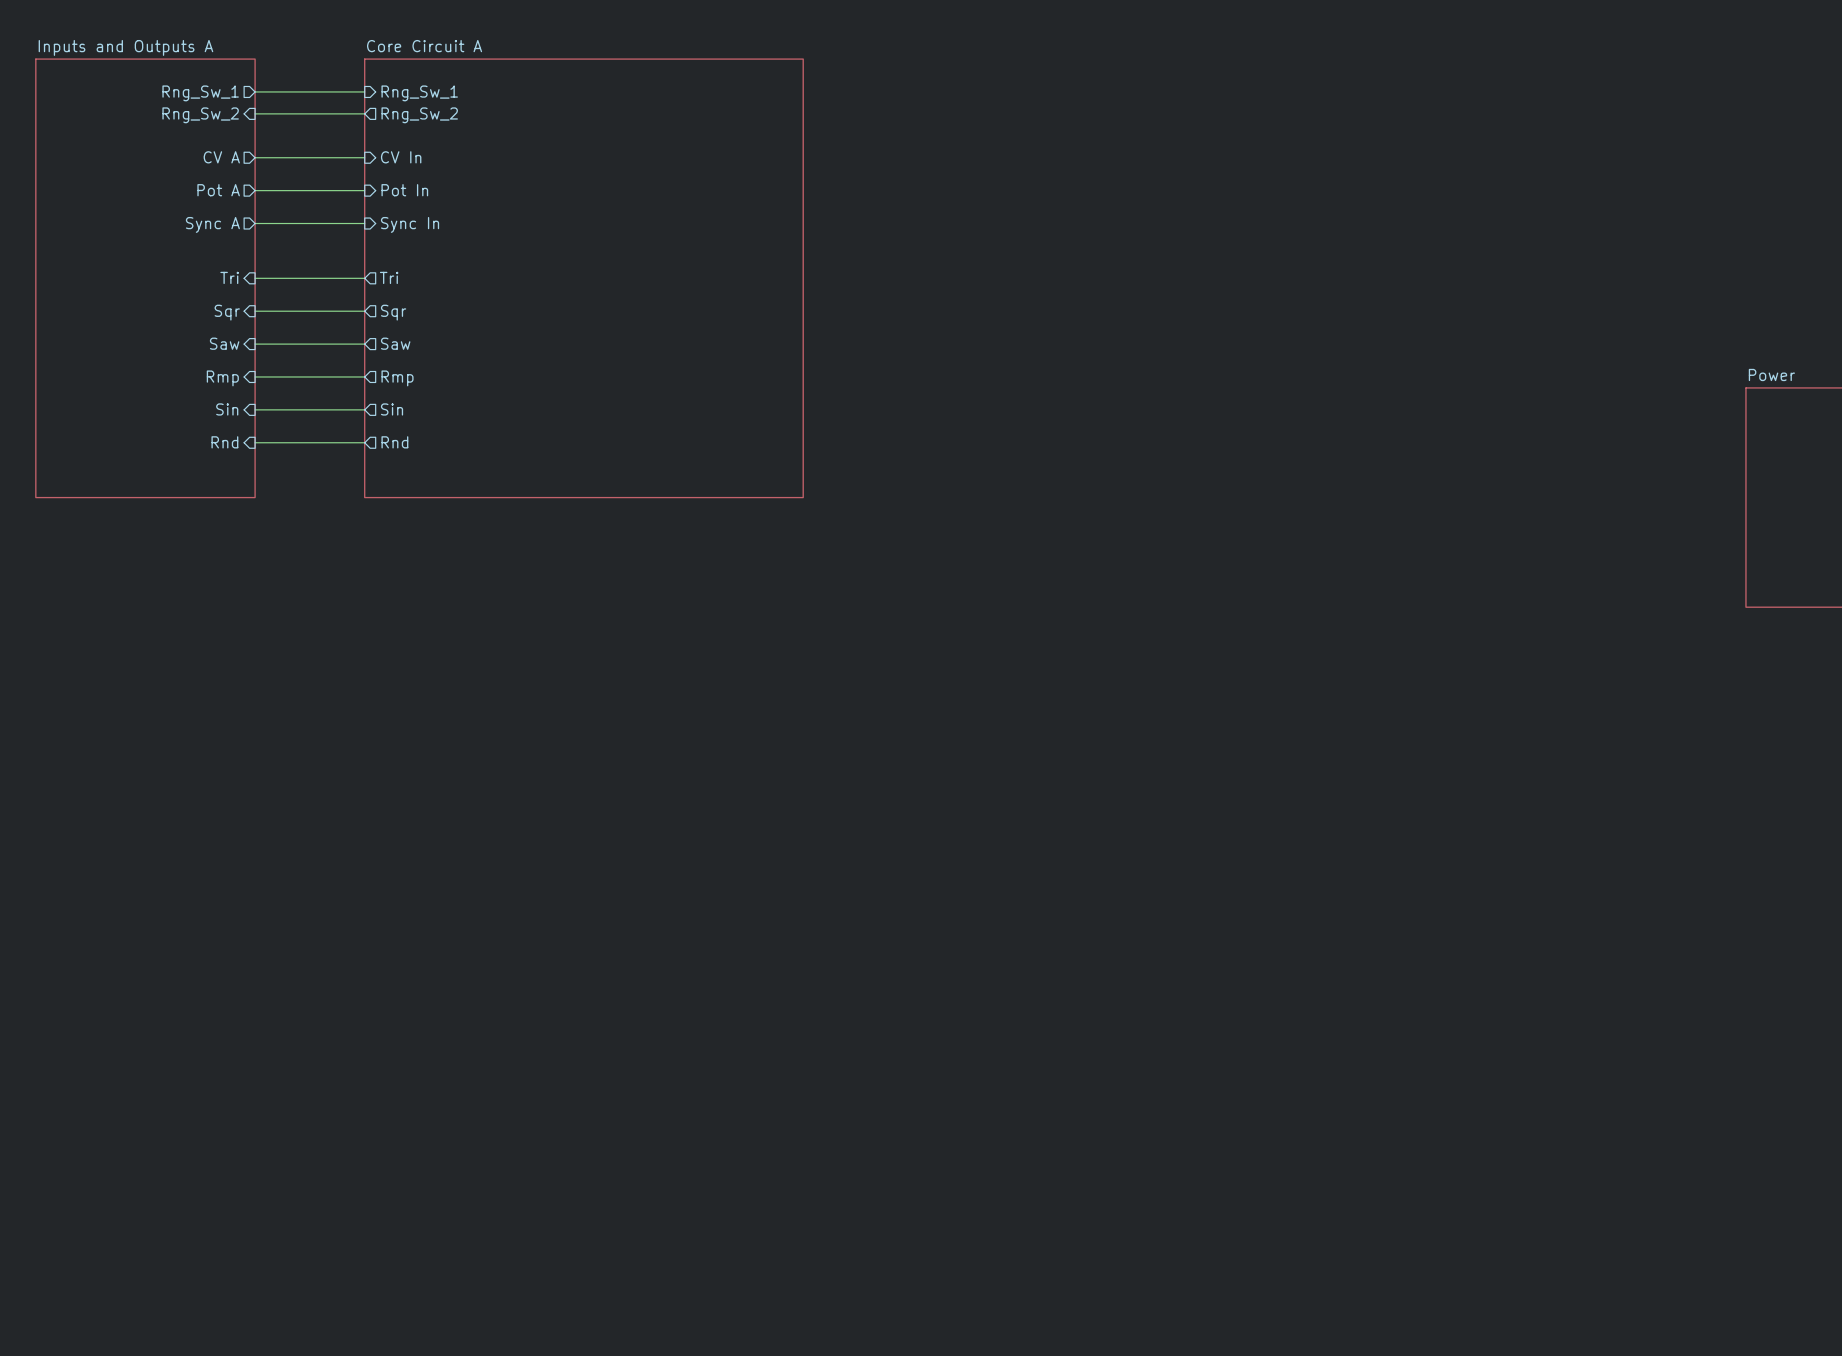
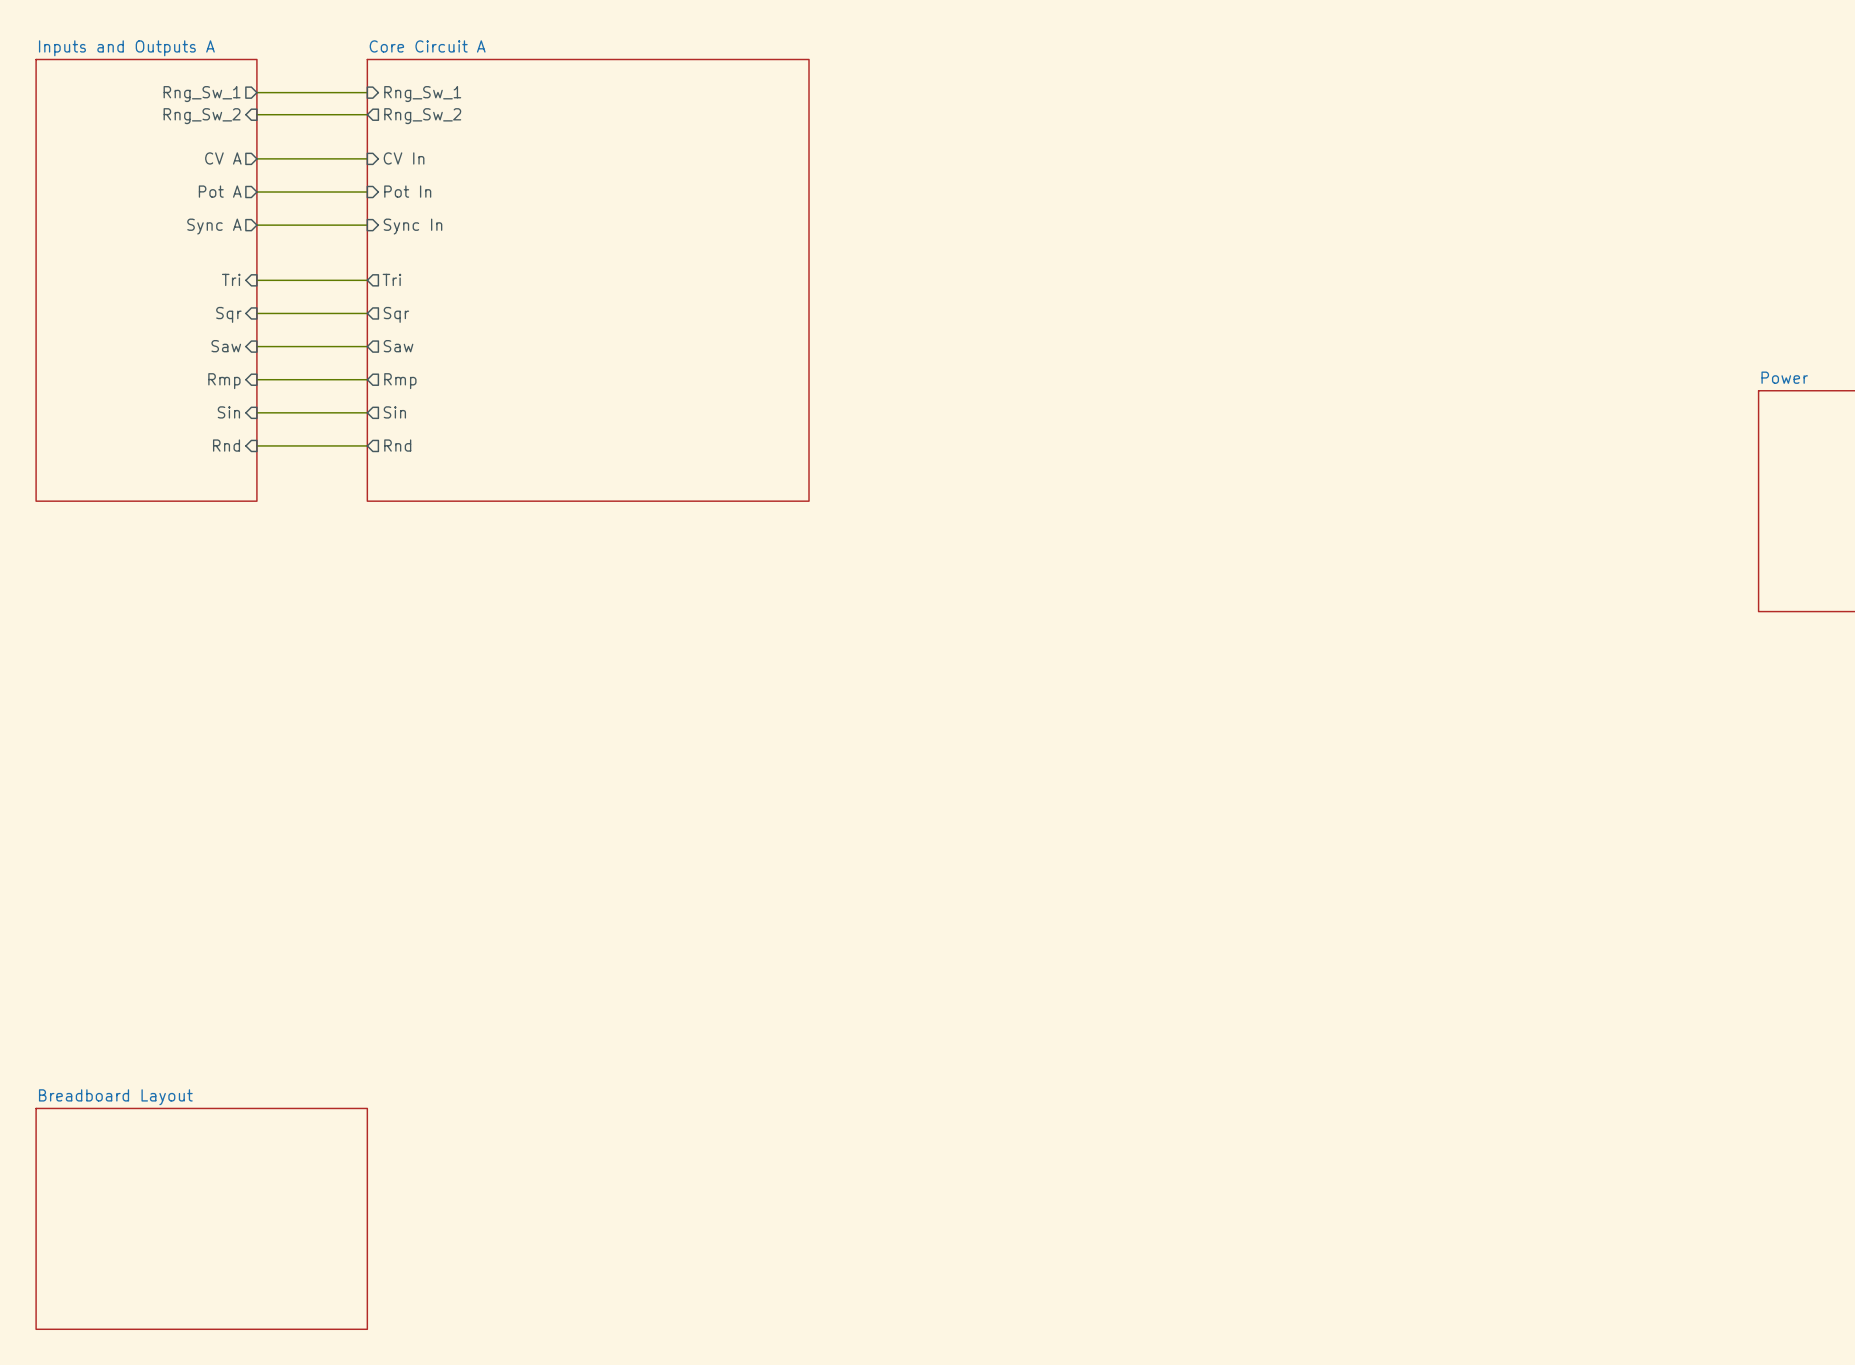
sheet Breadboard Layout: none -> (201, 1218)

